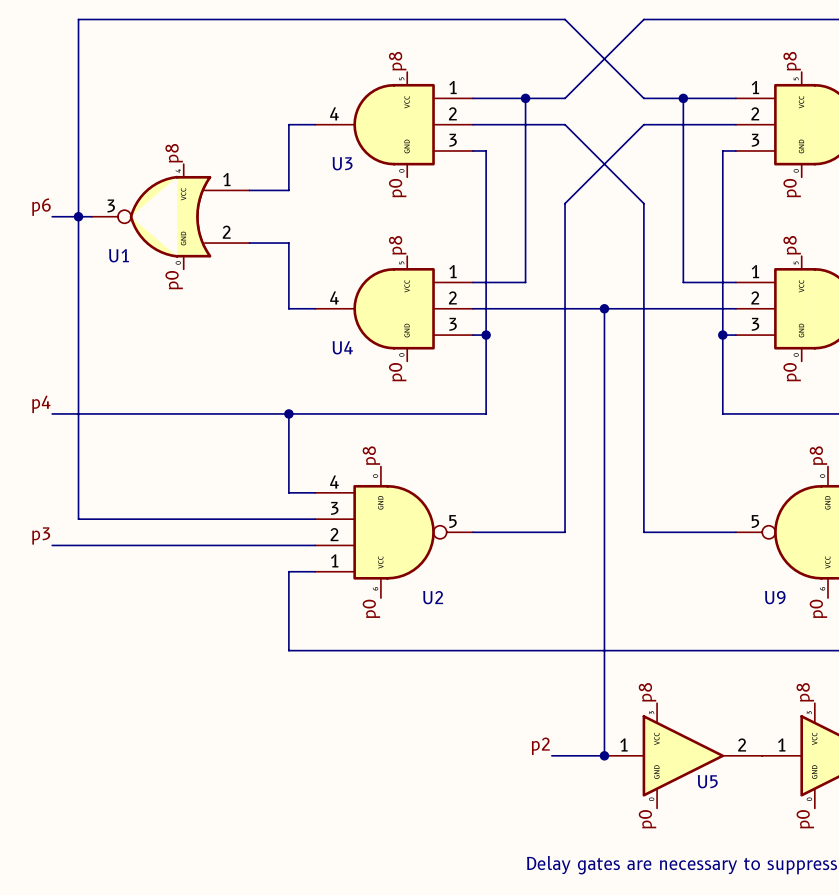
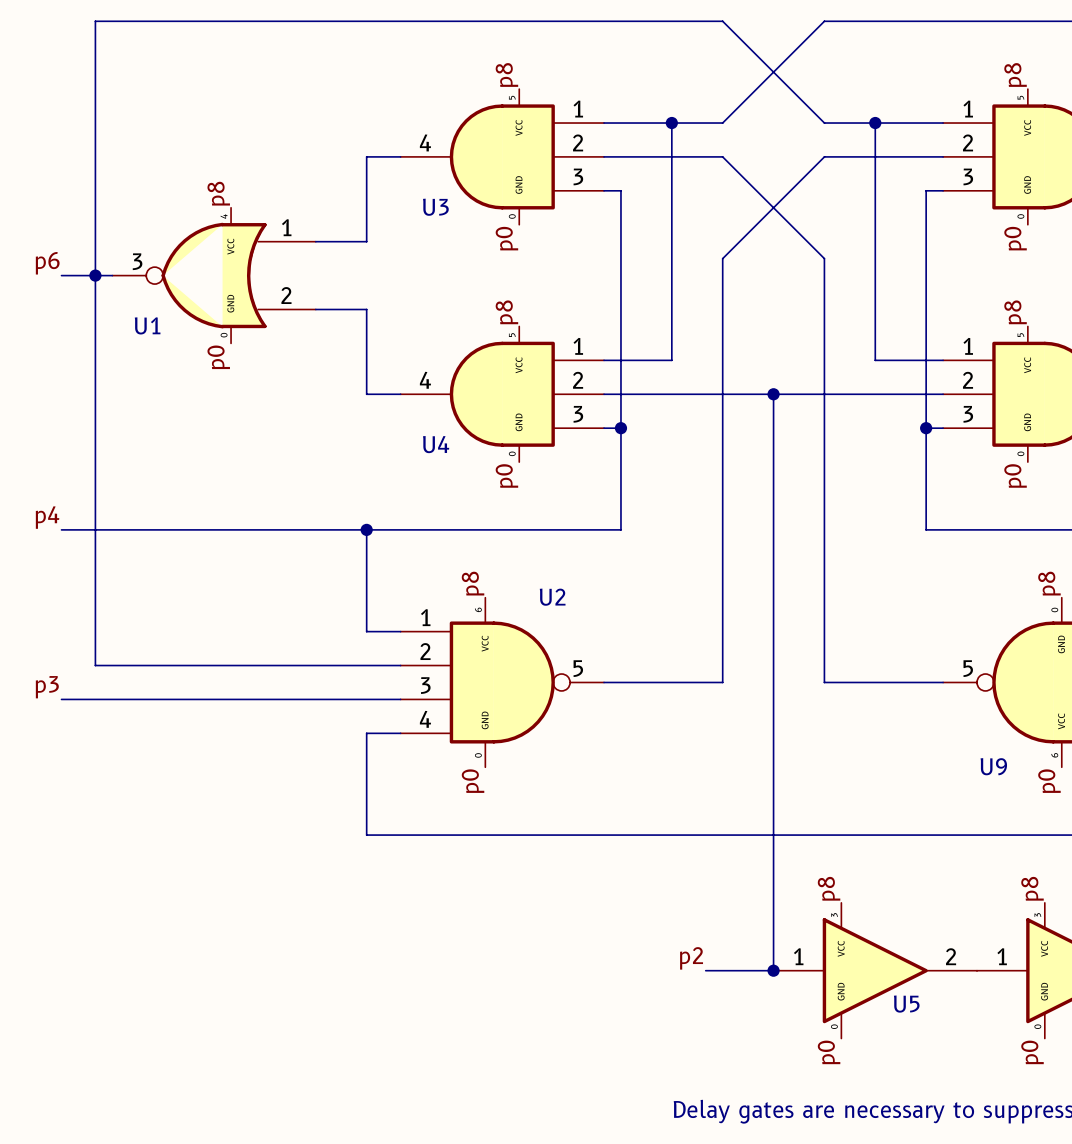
U2 flip: as is (394, 532) -> up-down (502, 682)

